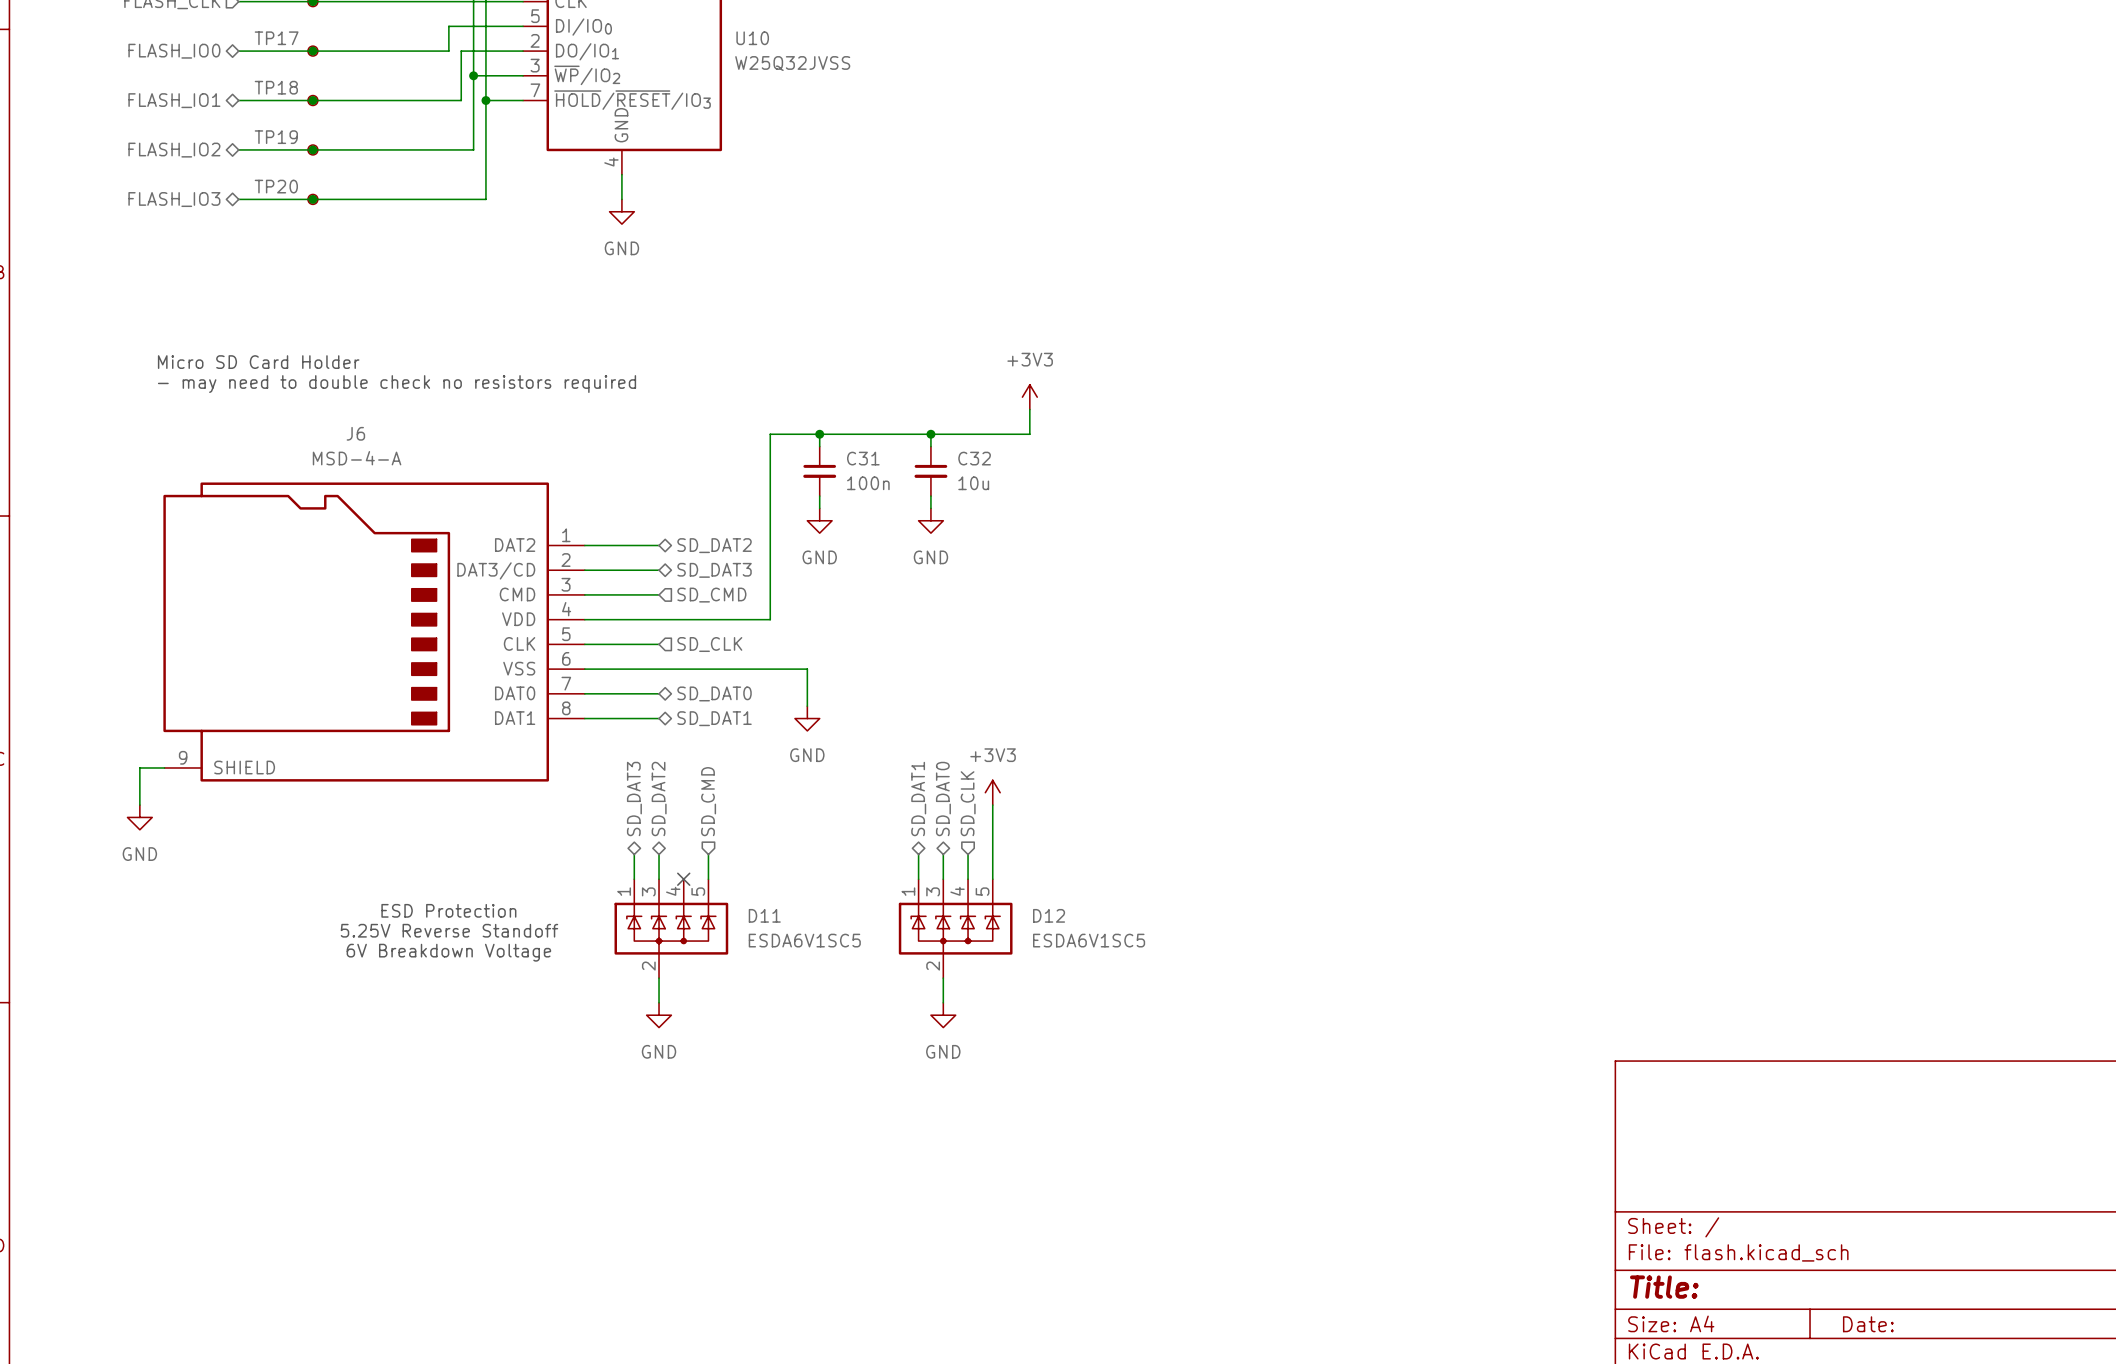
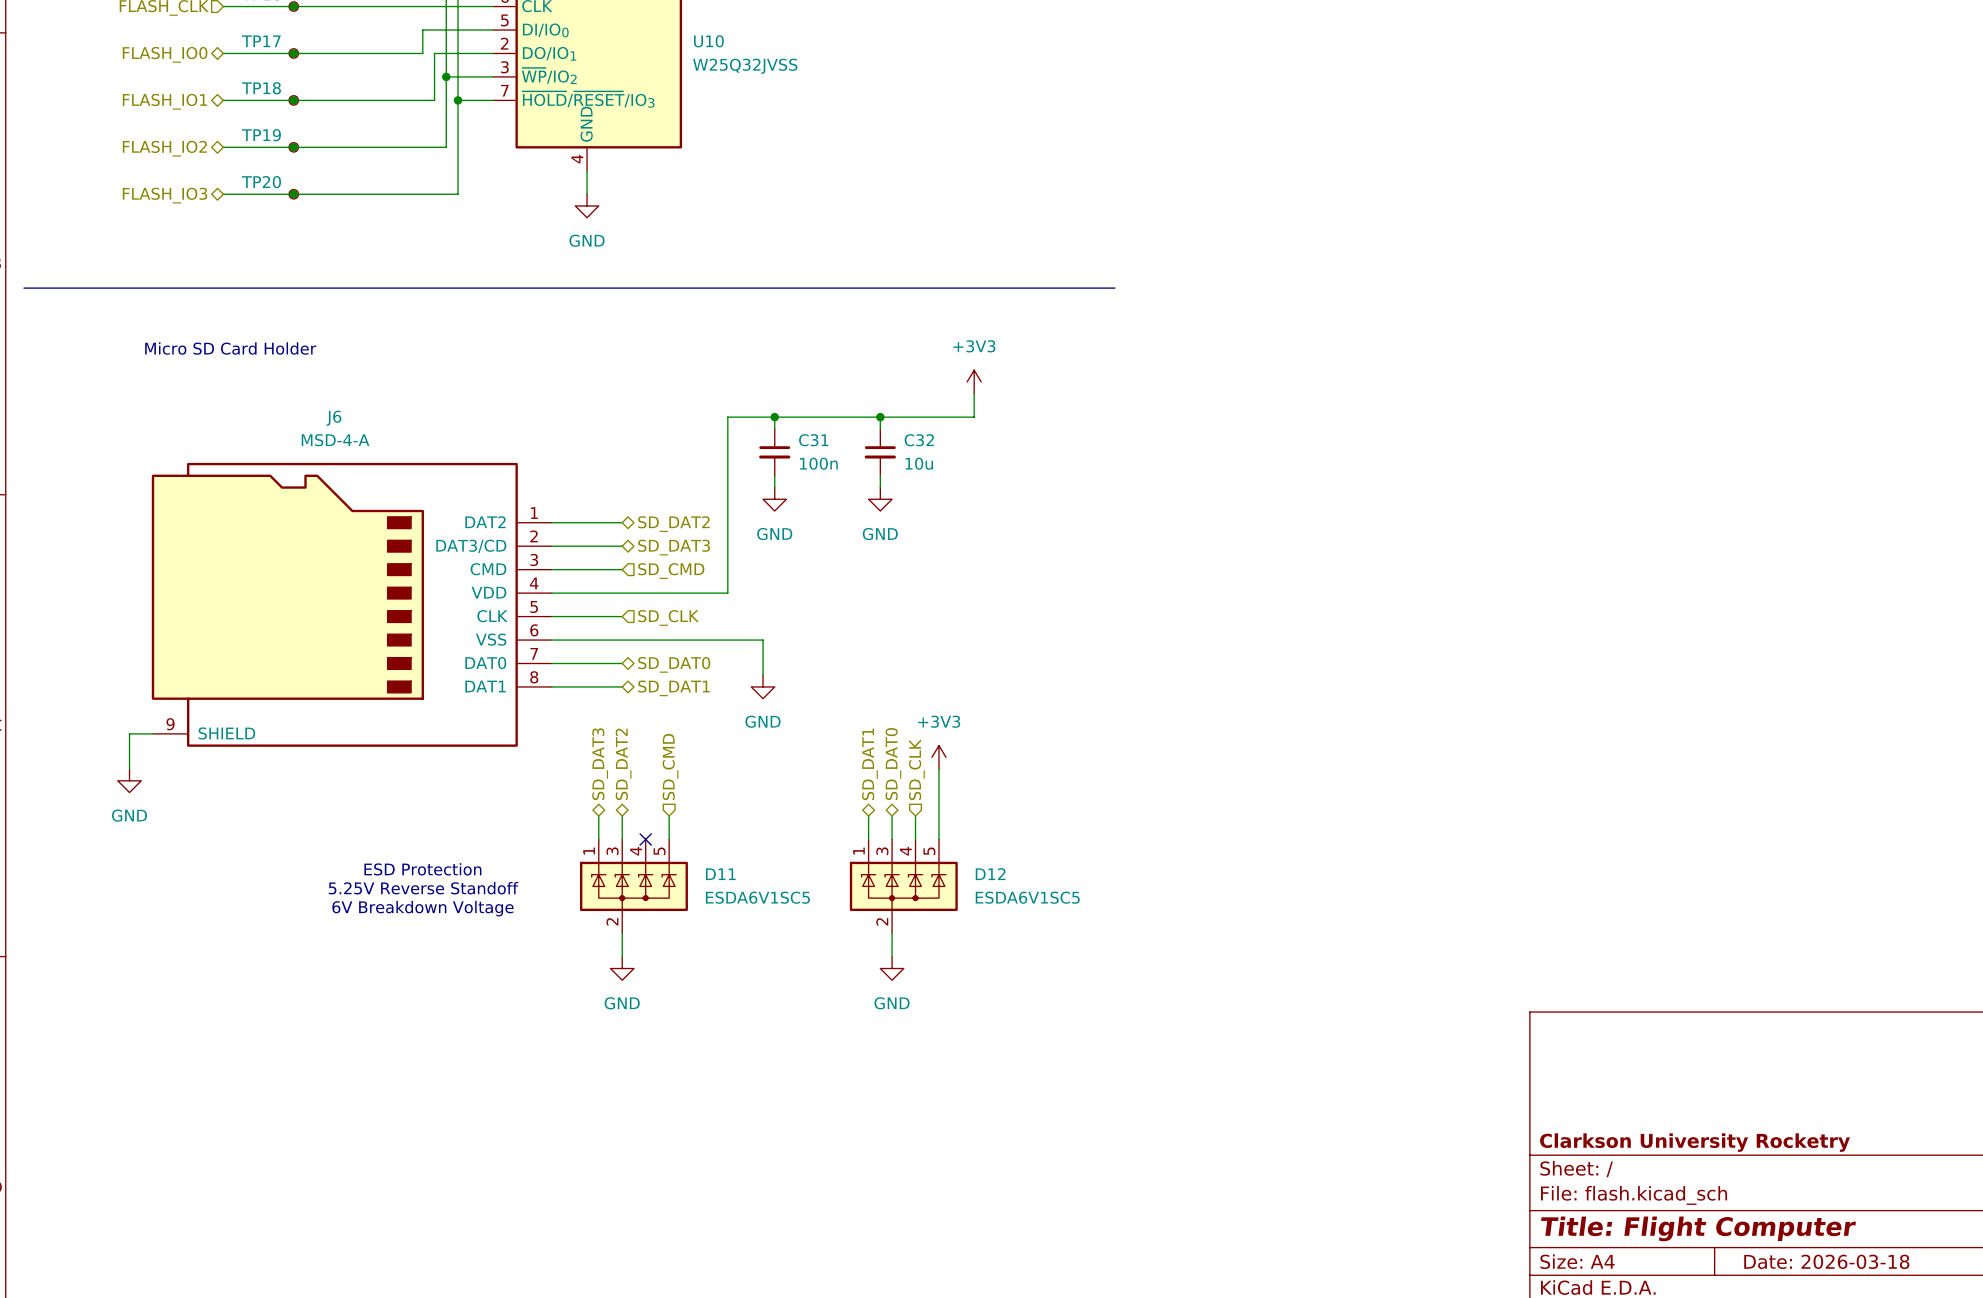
line: none -> (23, 288) (1114, 288)
text: - may need to double check no resistors required (397, 384) -> none
title block: none -> Clarkson University Rocketry (1695, 1142)
title block: Title: (1664, 1287) -> Title: Flight Computer (1698, 1228)
title block: Date: (1868, 1324) -> Date: 2026-03-18 (1826, 1261)

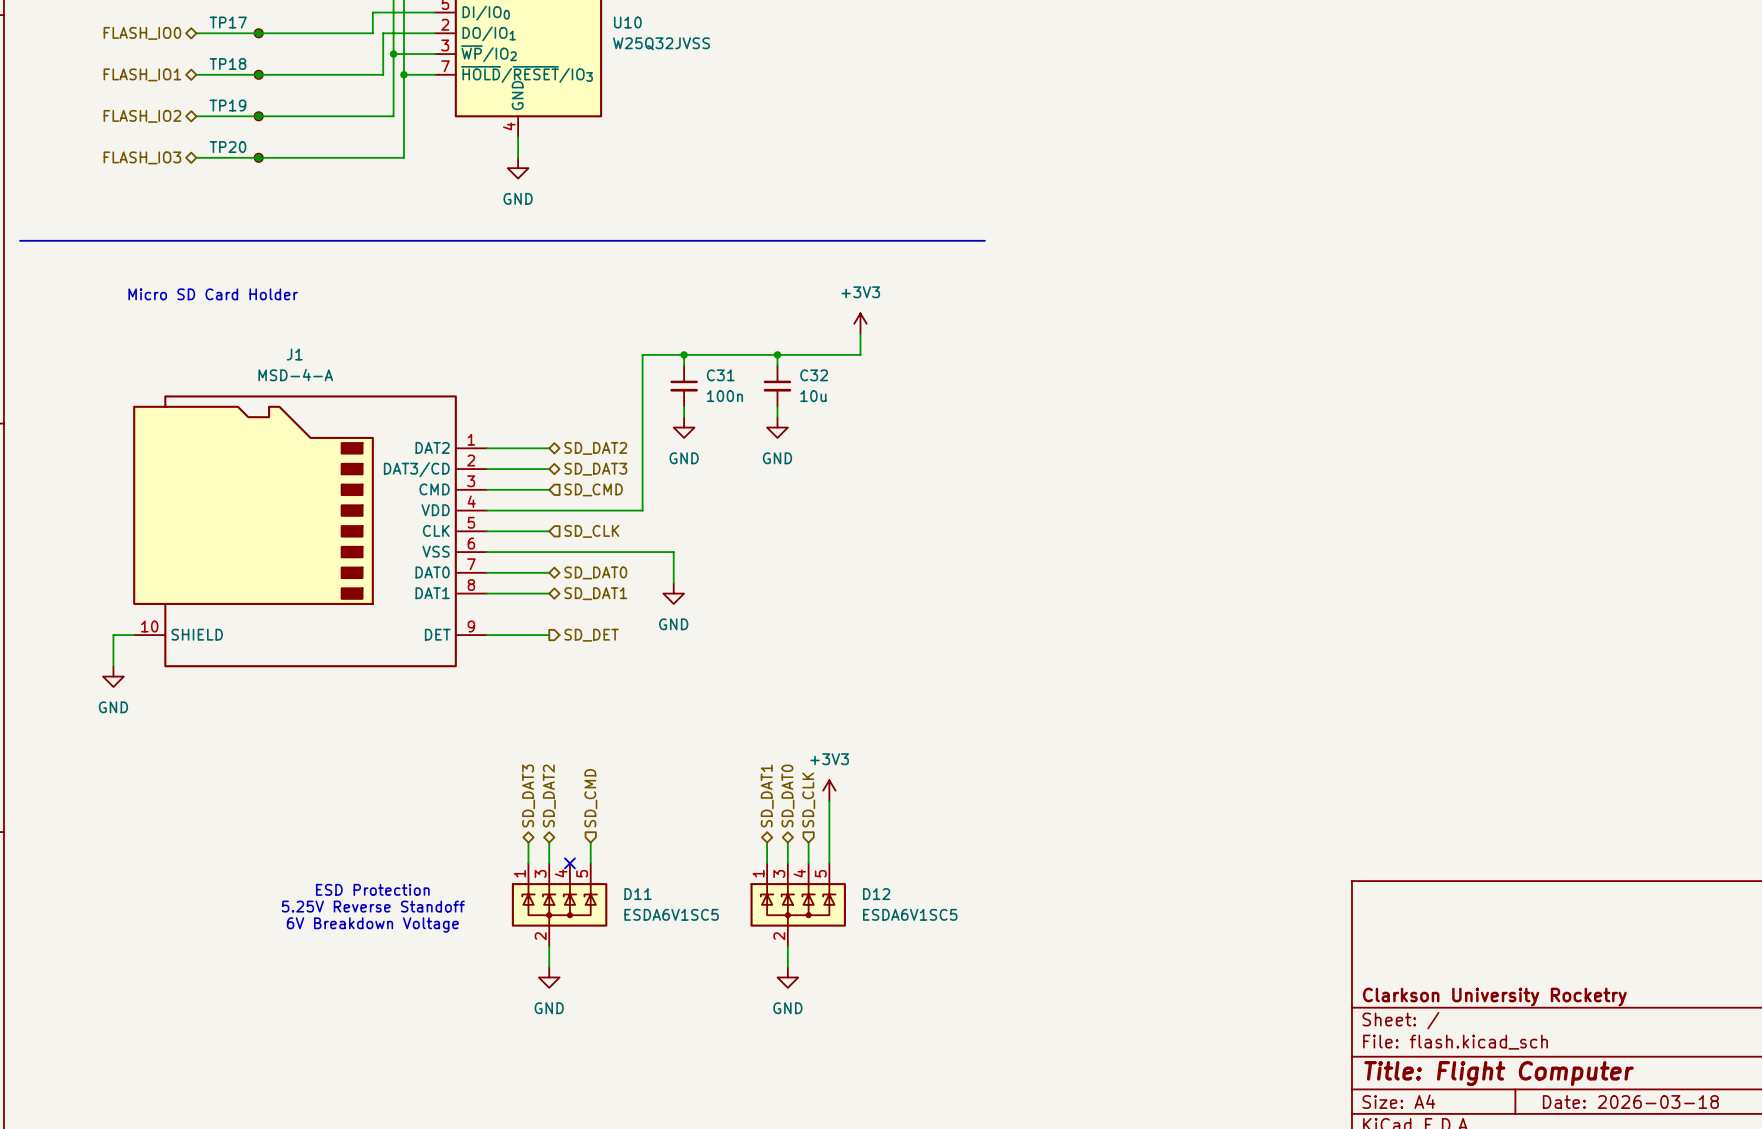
J6: MSD-4-A (351, 604) -> none
J1: none -> MSD-4-A (310, 531)
wire: none -> (486, 635) (549, 635)
hierarchical label: none -> SD_DET (591, 635)
power symbol position: +3V3 (938, 757) -> +3V3 (829, 790)
hierarchical label position: SD_DAT3 (600, 764) -> SD_DAT3 (528, 795)
hierarchical label position: SD_DAT2 (623, 764) -> SD_DAT2 (549, 795)
hierarchical label position: SD_DAT1 (869, 764) -> SD_DAT1 (767, 795)
hierarchical label position: SD_DAT0 (893, 764) -> SD_DAT0 (787, 795)
hierarchical label position: SD_CMD (670, 766) -> SD_CMD (590, 798)
hierarchical label position: SD_CLK (916, 769) -> SD_CLK (808, 799)
wire: (938, 769) (938, 839) -> (829, 801) (829, 863)
wire: (598, 816) (598, 839) -> (528, 842) (528, 863)
wire: (622, 816) (622, 839) -> (549, 842) (549, 863)
wire: (669, 816) (669, 839) -> (590, 842) (590, 863)
wire: (868, 816) (868, 839) -> (767, 842) (767, 863)
wire: (892, 816) (892, 839) -> (787, 842) (787, 863)
wire: (915, 816) (915, 839) -> (808, 842) (808, 863)
no-connect mark: (645, 839) -> none
text position: ESD Protection (422, 869) -> ESD Protection (372, 889)
D11 position: (633, 886) -> (559, 904)
D12 position: (903, 886) -> (798, 904)
text position: 5.25V Reverse Standoff (423, 888) -> 5.25V Reverse Standoff (373, 906)
text position: 6V Breakdown Voltage (422, 908) -> 6V Breakdown Voltage (372, 925)
wire: (622, 933) (622, 956) -> (549, 946) (549, 967)
wire: (892, 933) (892, 956) -> (787, 946) (787, 967)
power symbol position: GND (622, 968) -> GND (549, 977)
power symbol position: GND (892, 968) -> GND (787, 977)
no-connect mark: none -> (569, 863)

